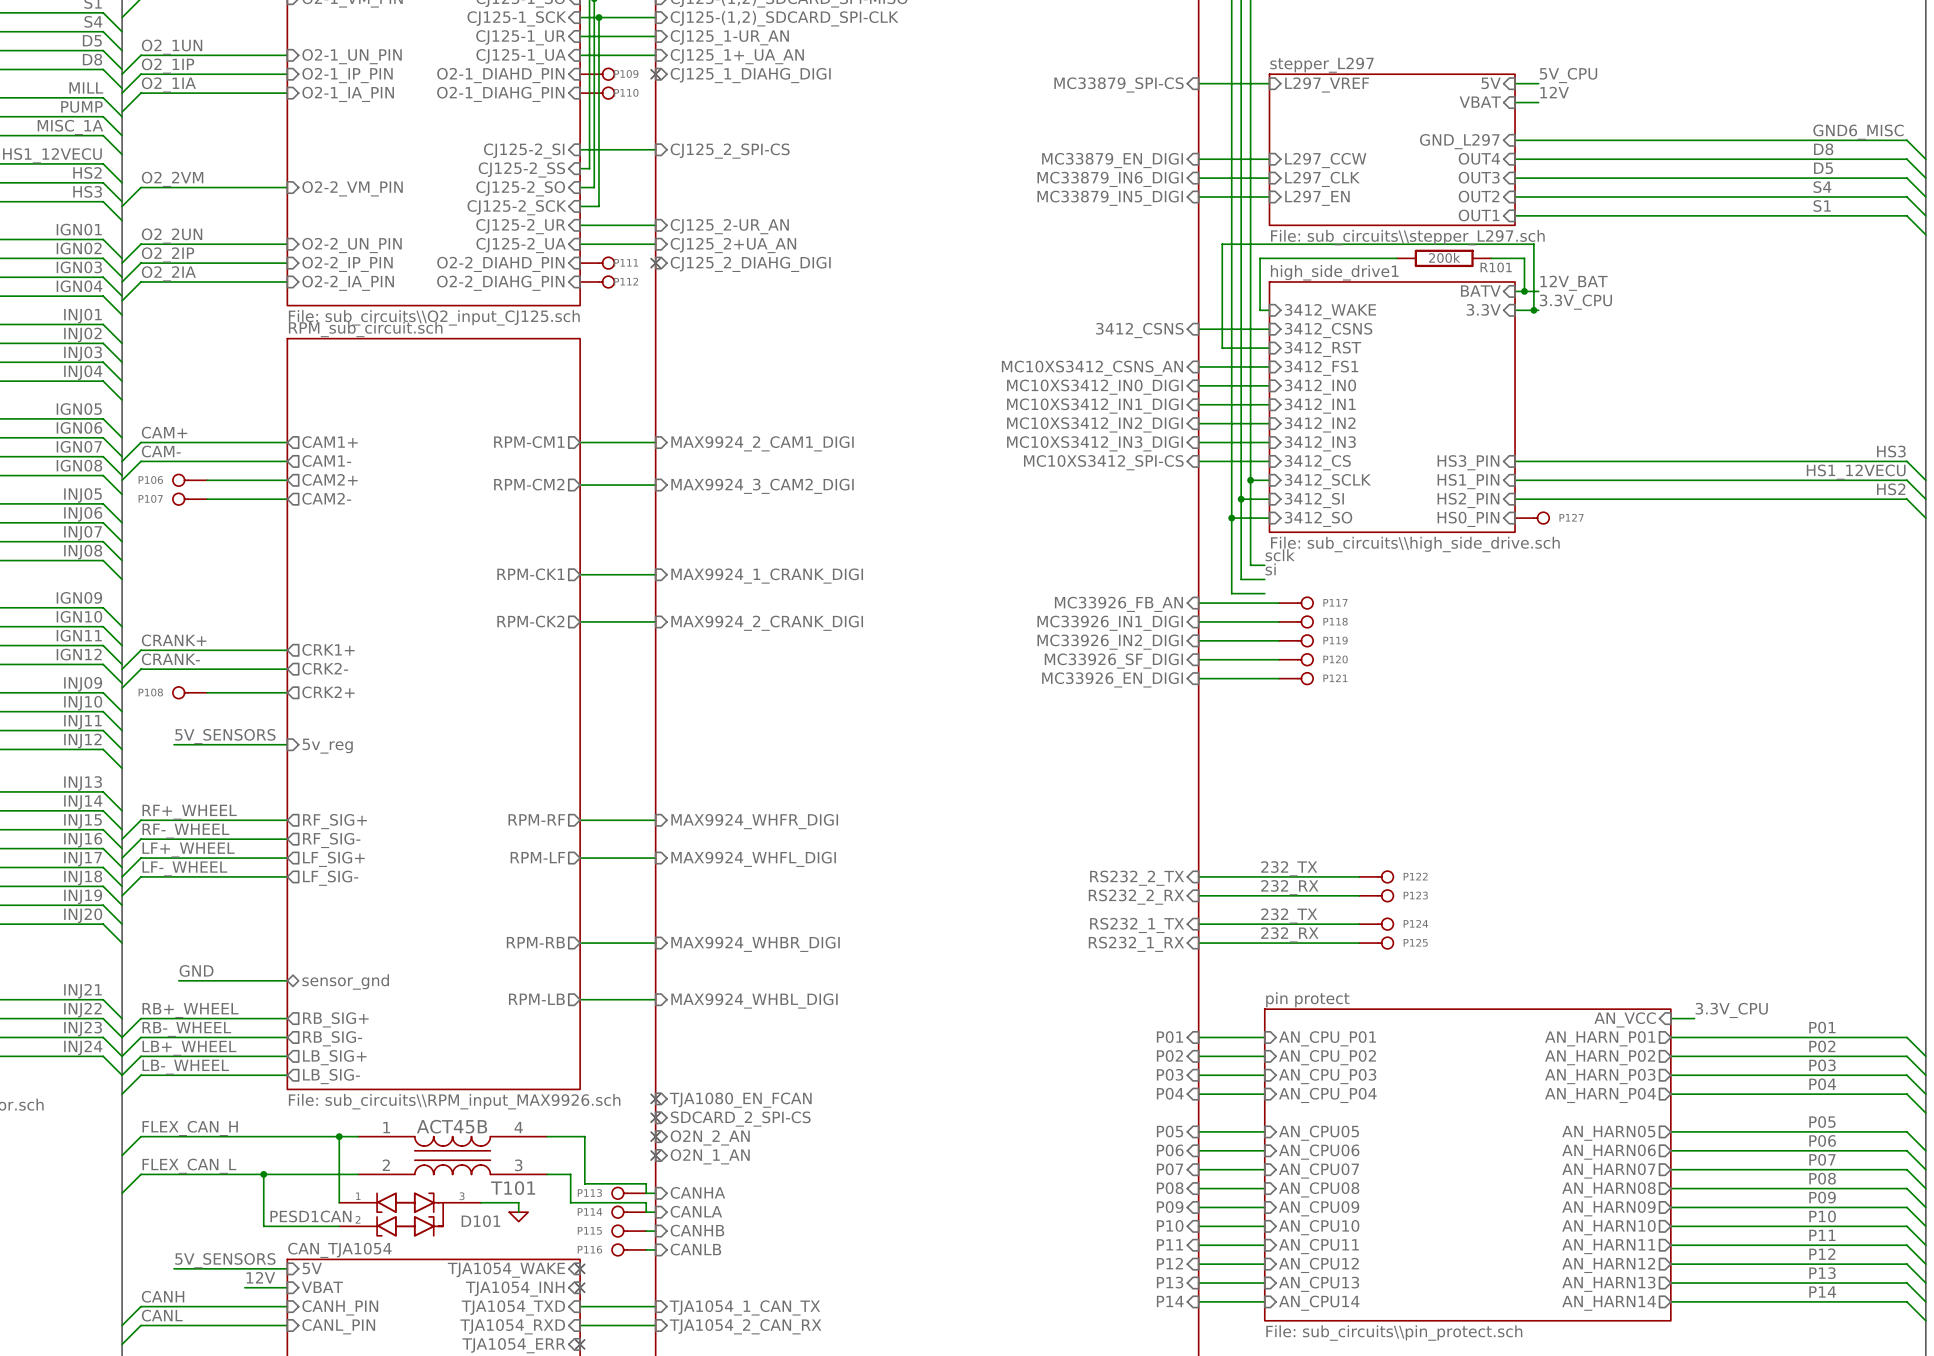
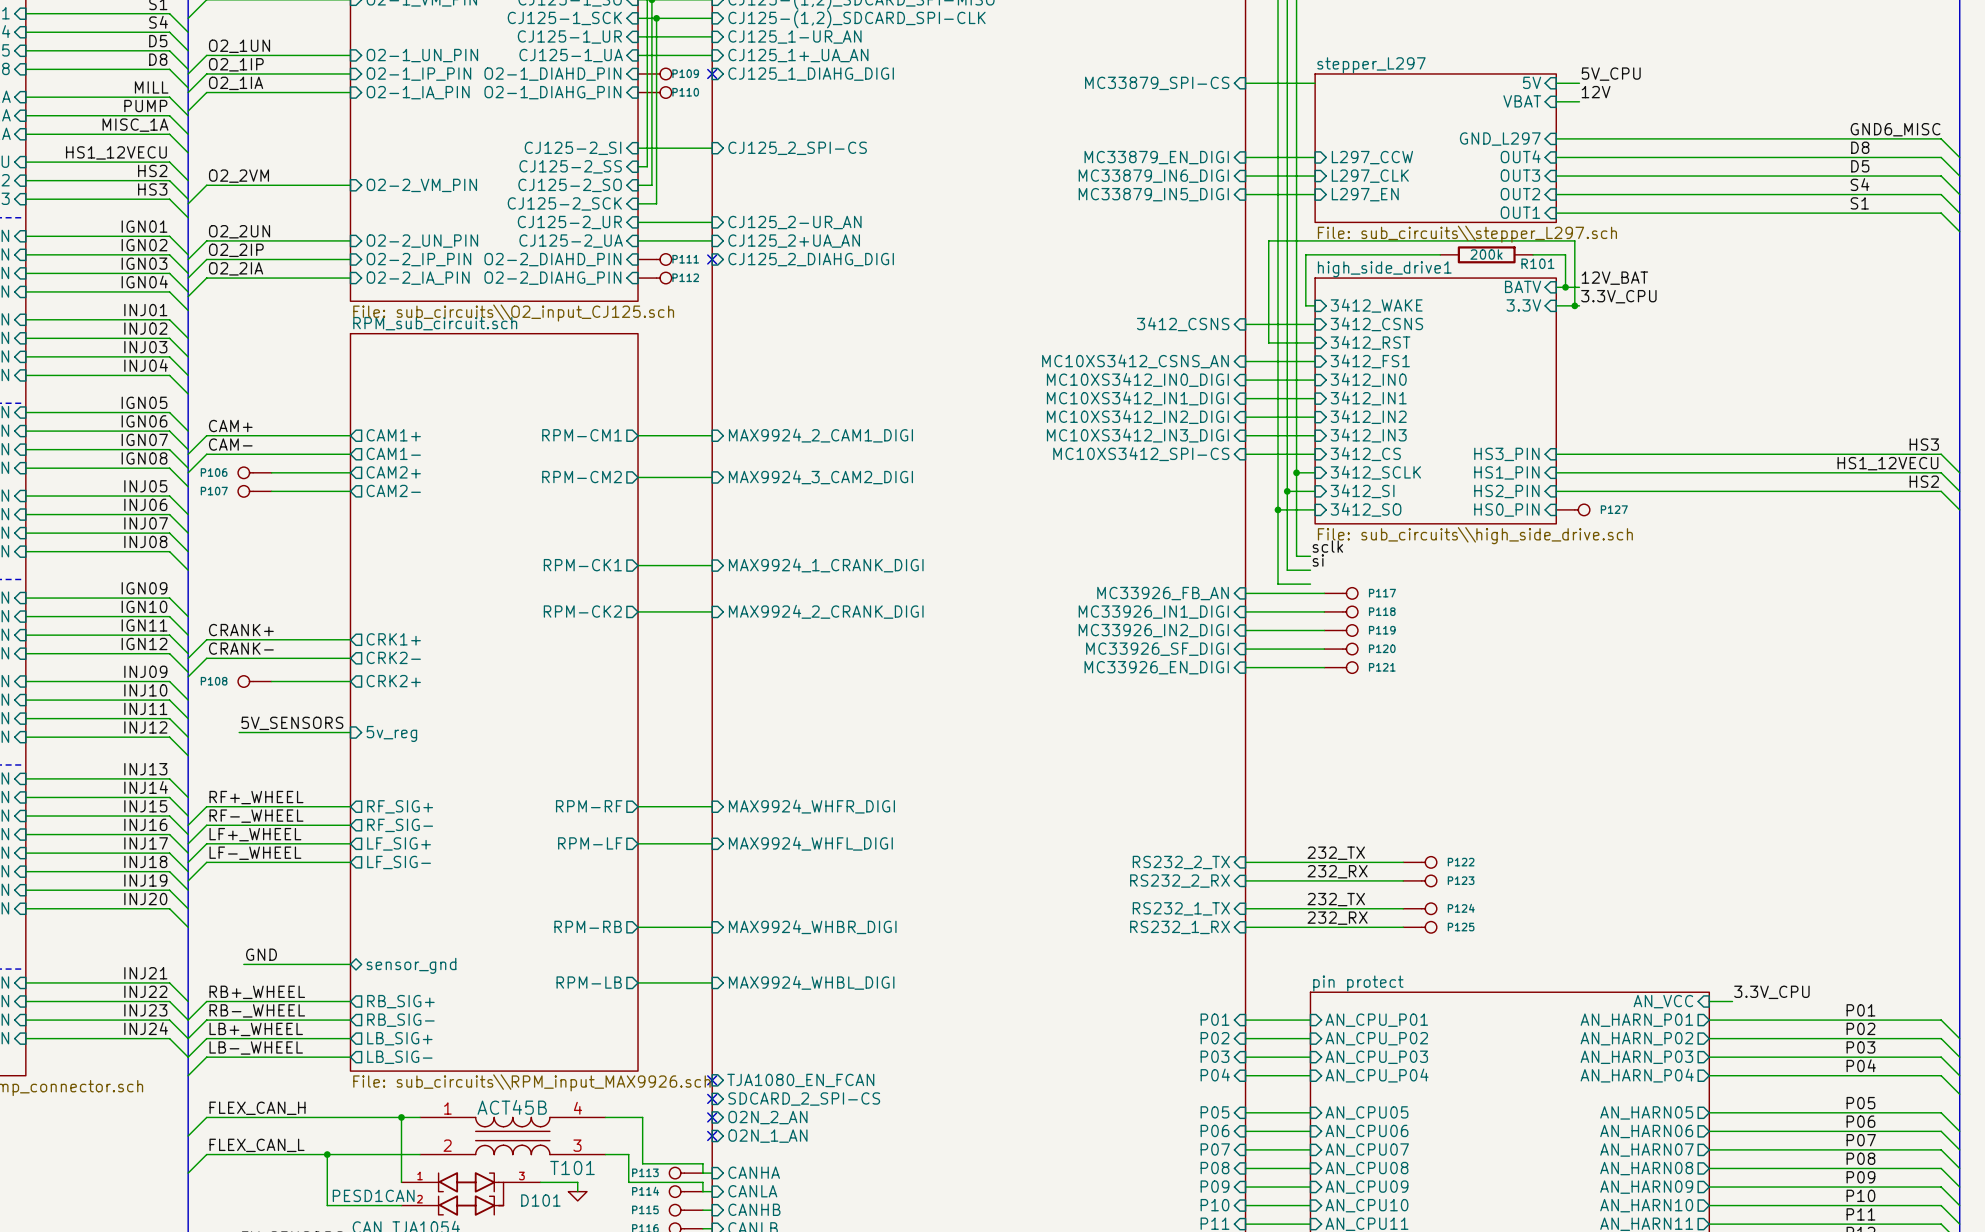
sheet pin: L297_VREF (1327, 84) -> none

